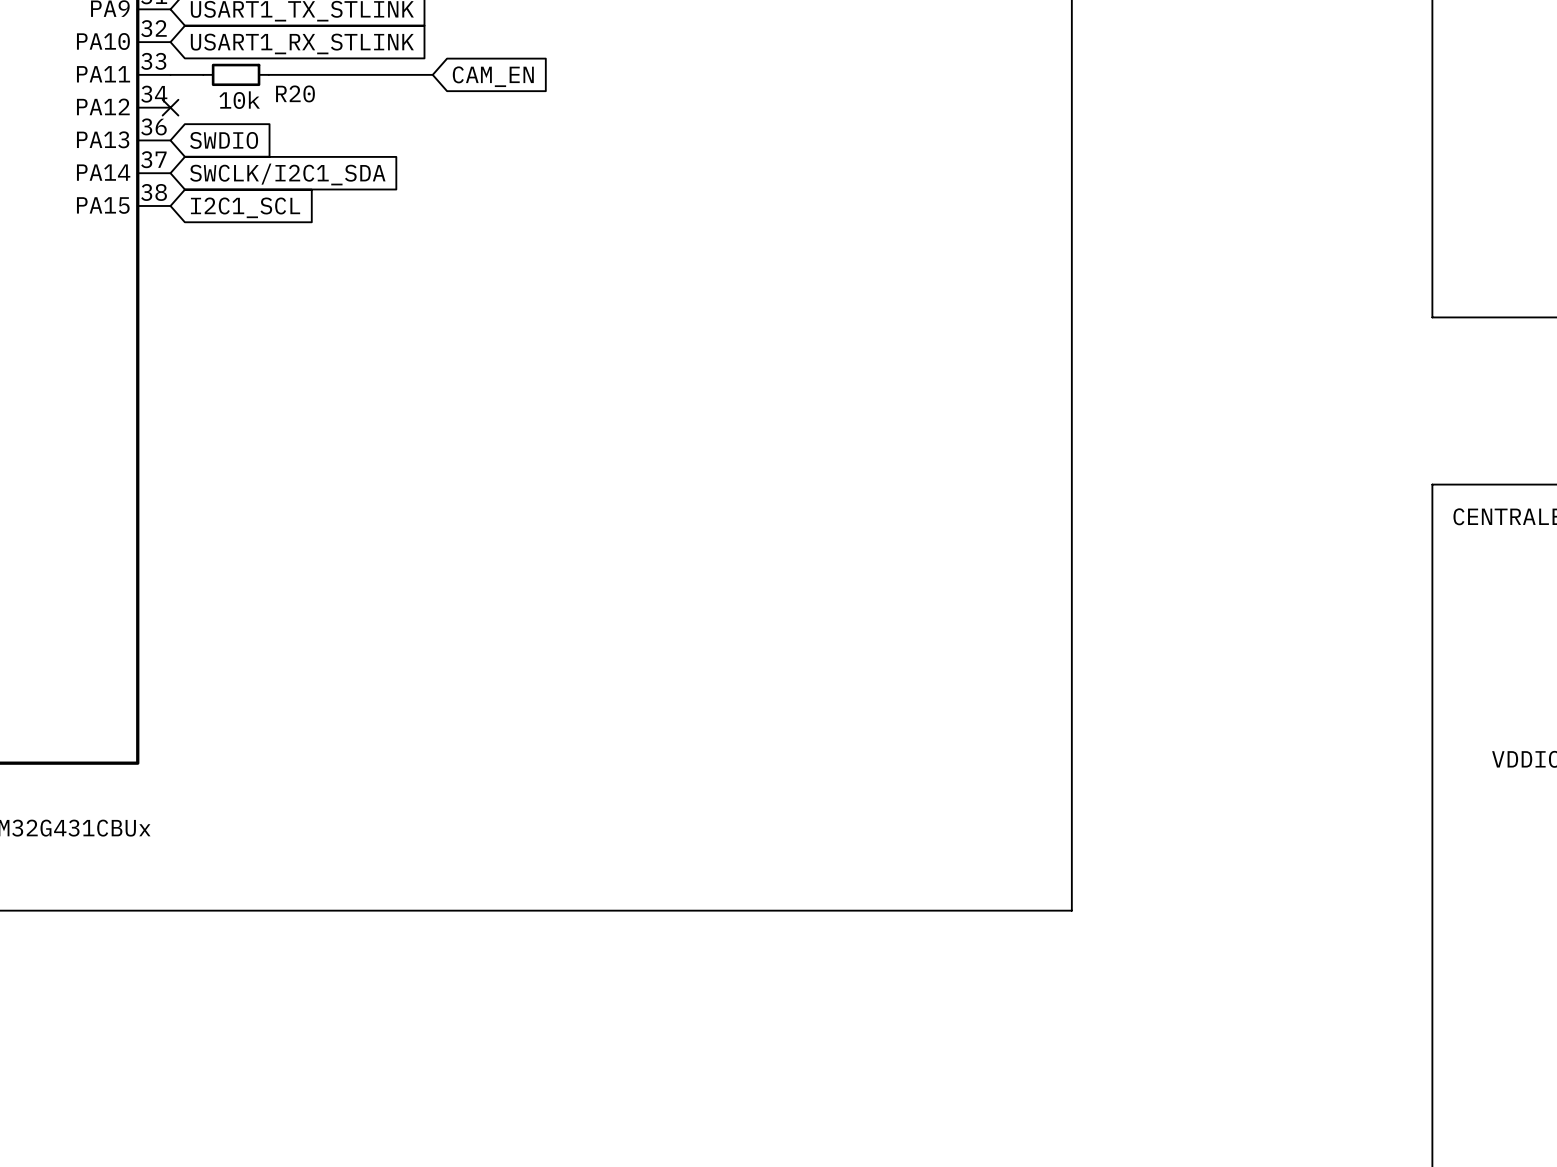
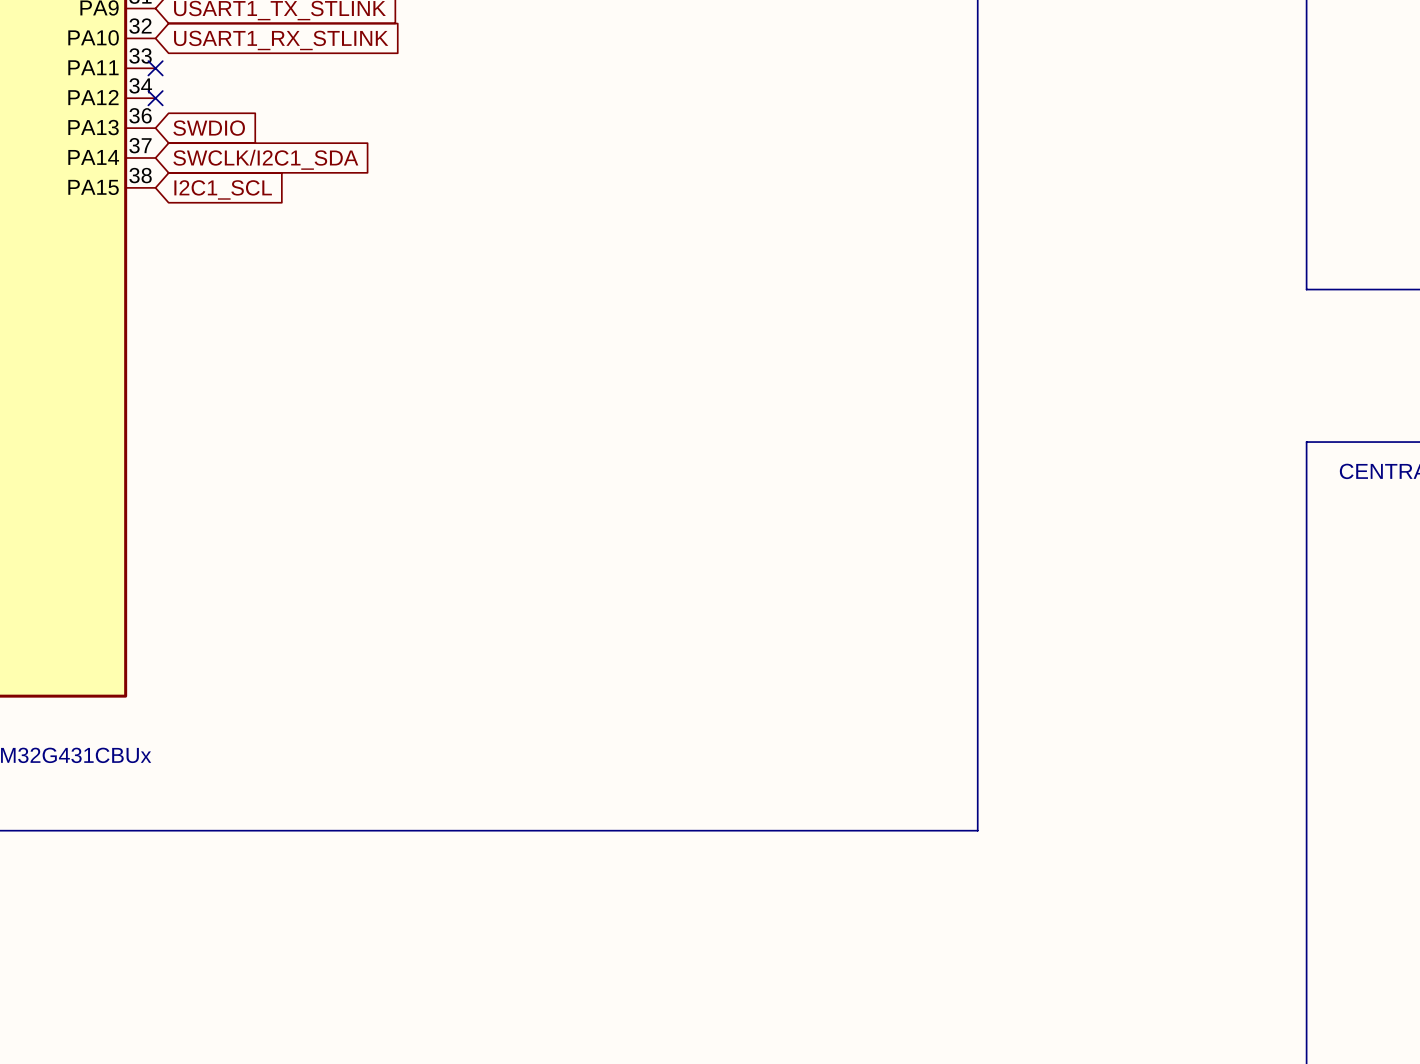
wire: (170, 74) (203, 74) -> none
no-connect mark: none -> (155, 68)
R20: 10k (236, 74) -> none
wire: (268, 74) (432, 74) -> none
global label: CAM_EN (493, 76) -> none

